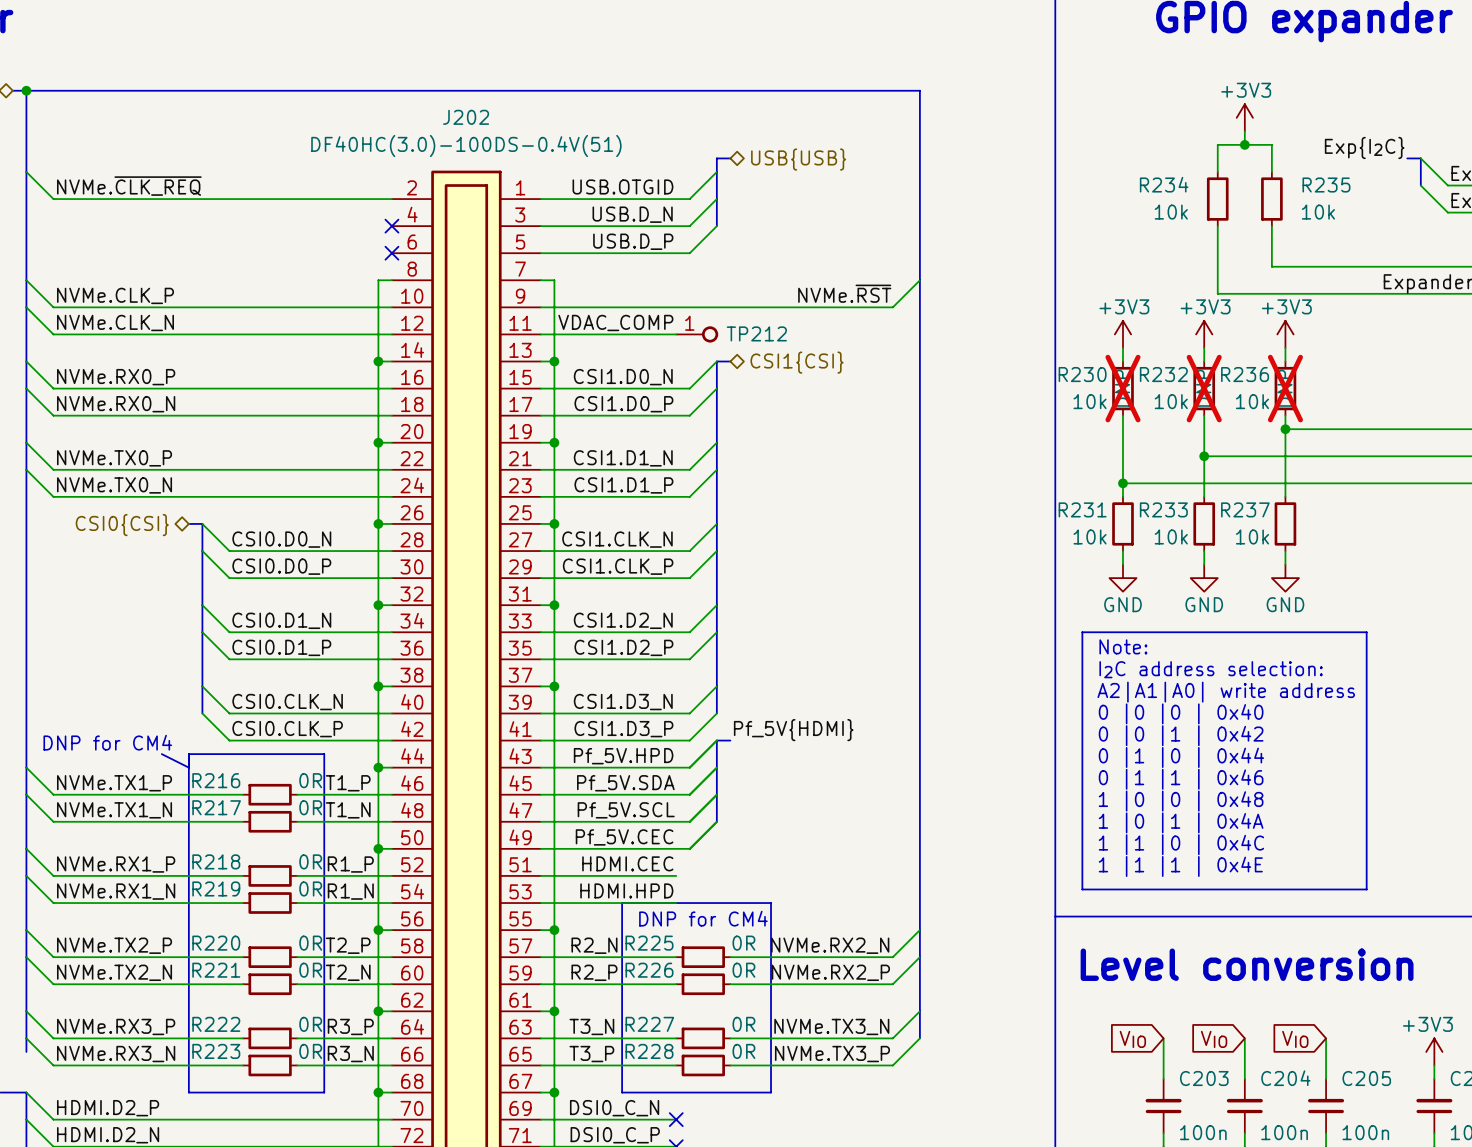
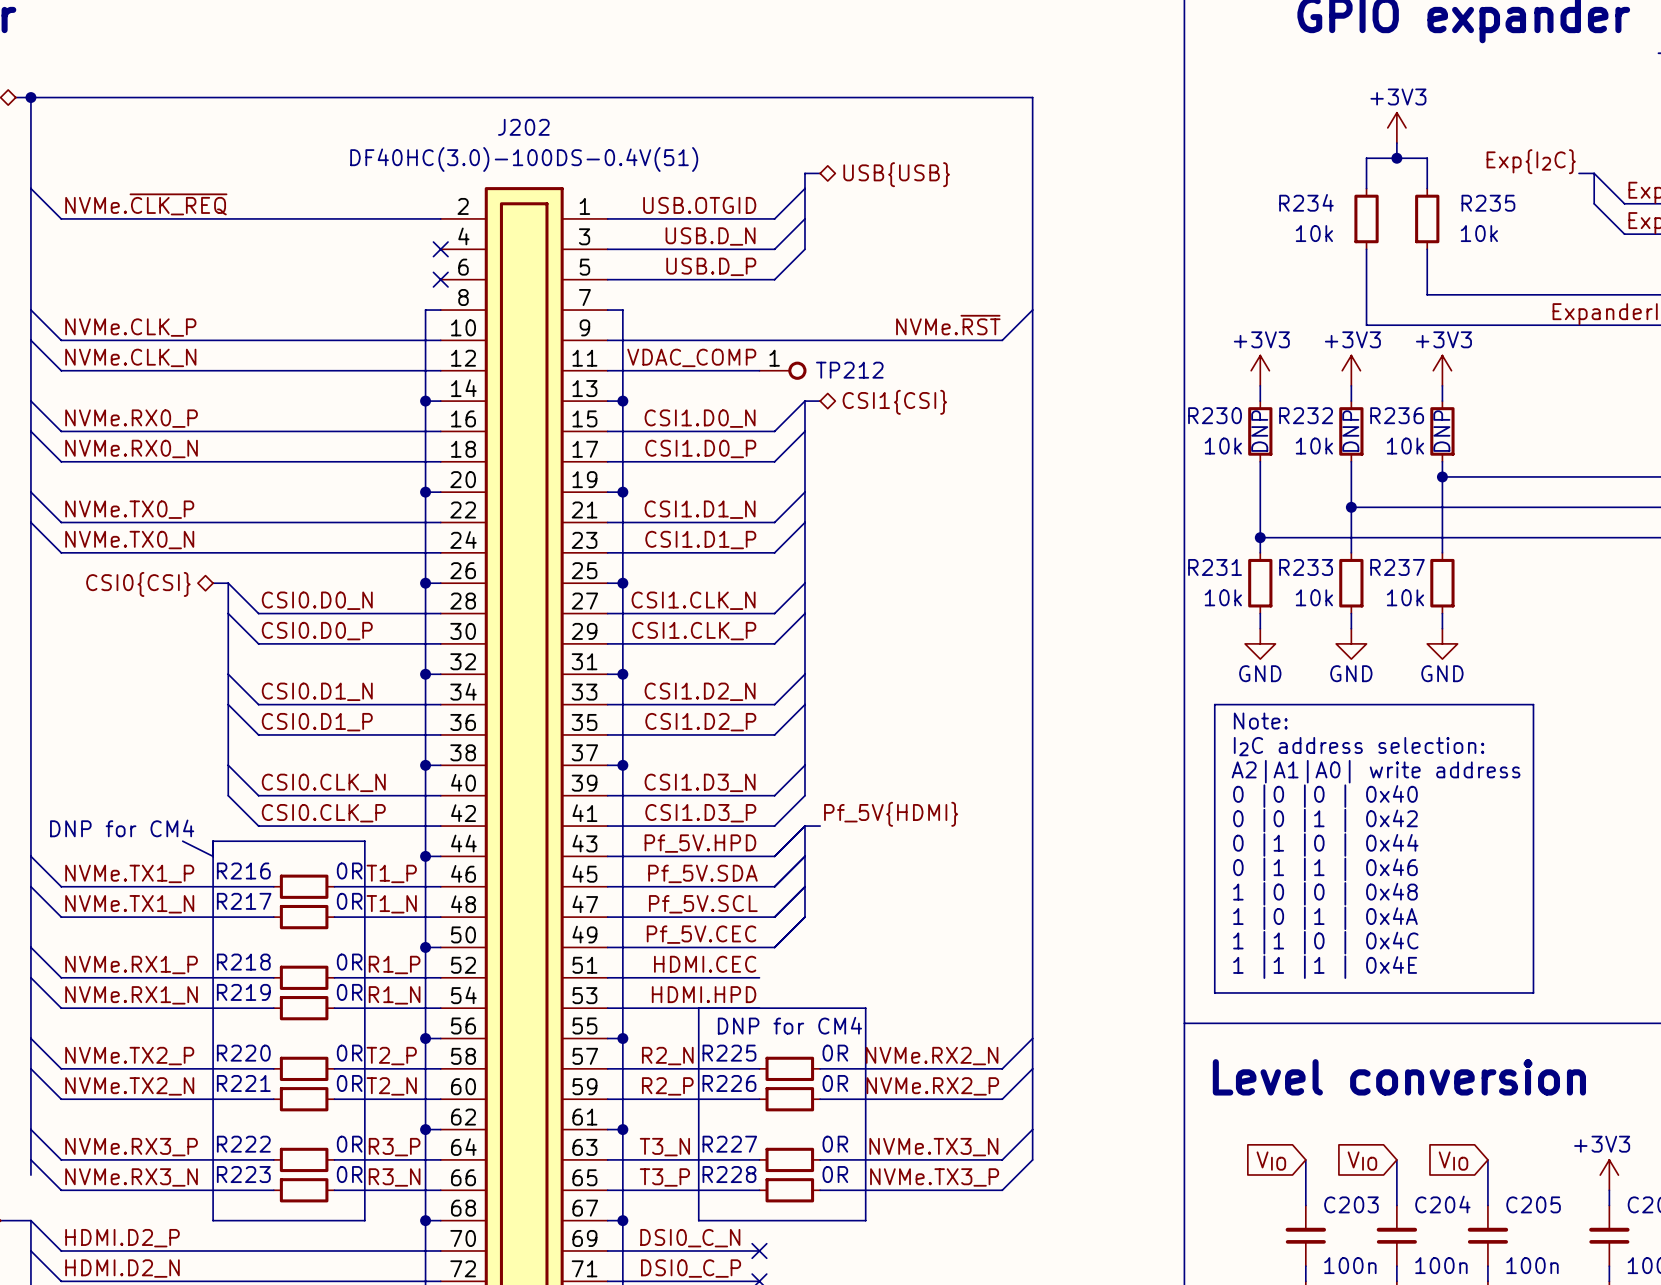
R230 do-not-place cross: (1122, 388) -> none
R232 do-not-place cross: (1204, 388) -> none
R236 do-not-place cross: (1285, 388) -> none

